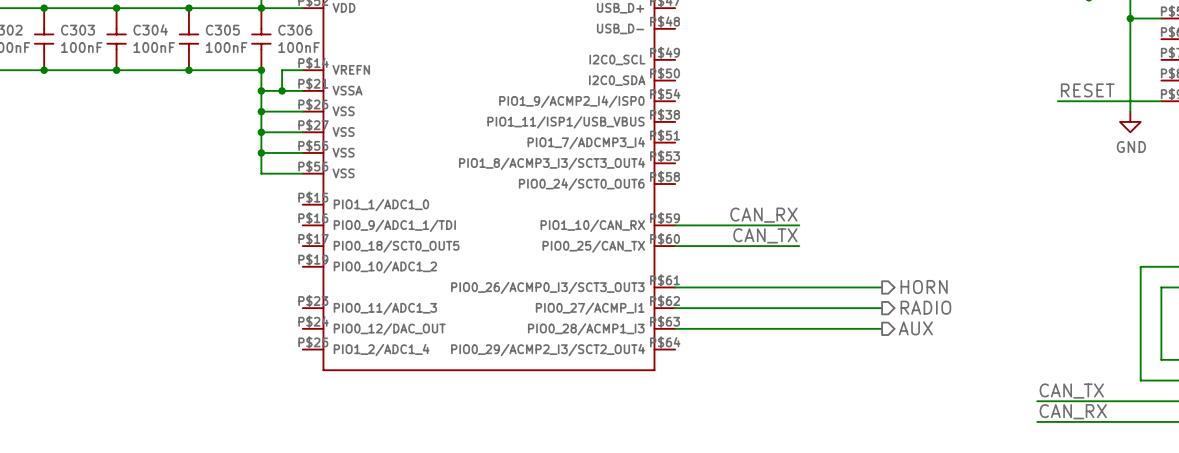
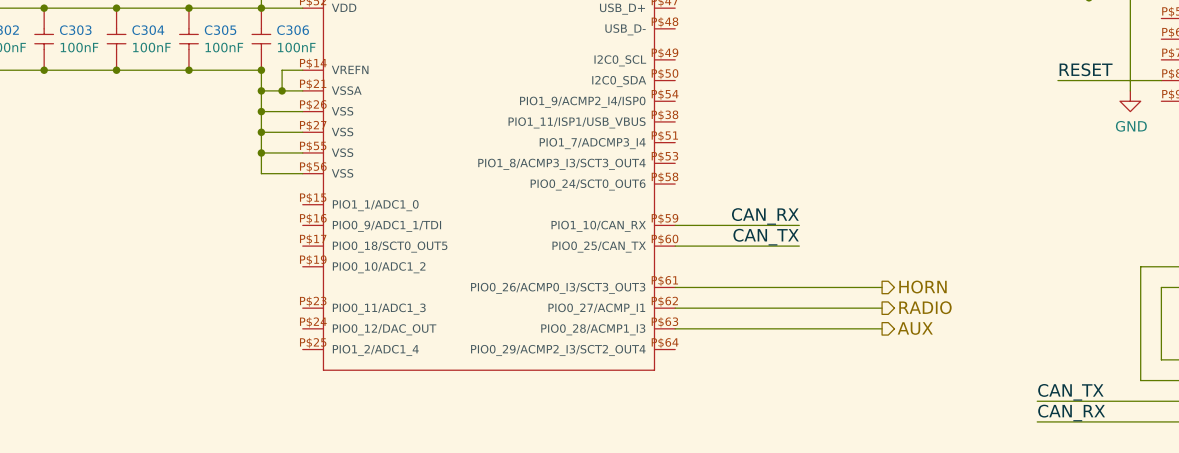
wire: (1130, 18) (1161, 18) -> none
junction: (1130, 18) -> none
label position: RESET (1087, 90) -> RESET (1086, 69)
wire: (1057, 101) (1161, 101) -> (1057, 80) (1161, 80)
power symbol position: GND (1130, 121) -> GND (1130, 101)

